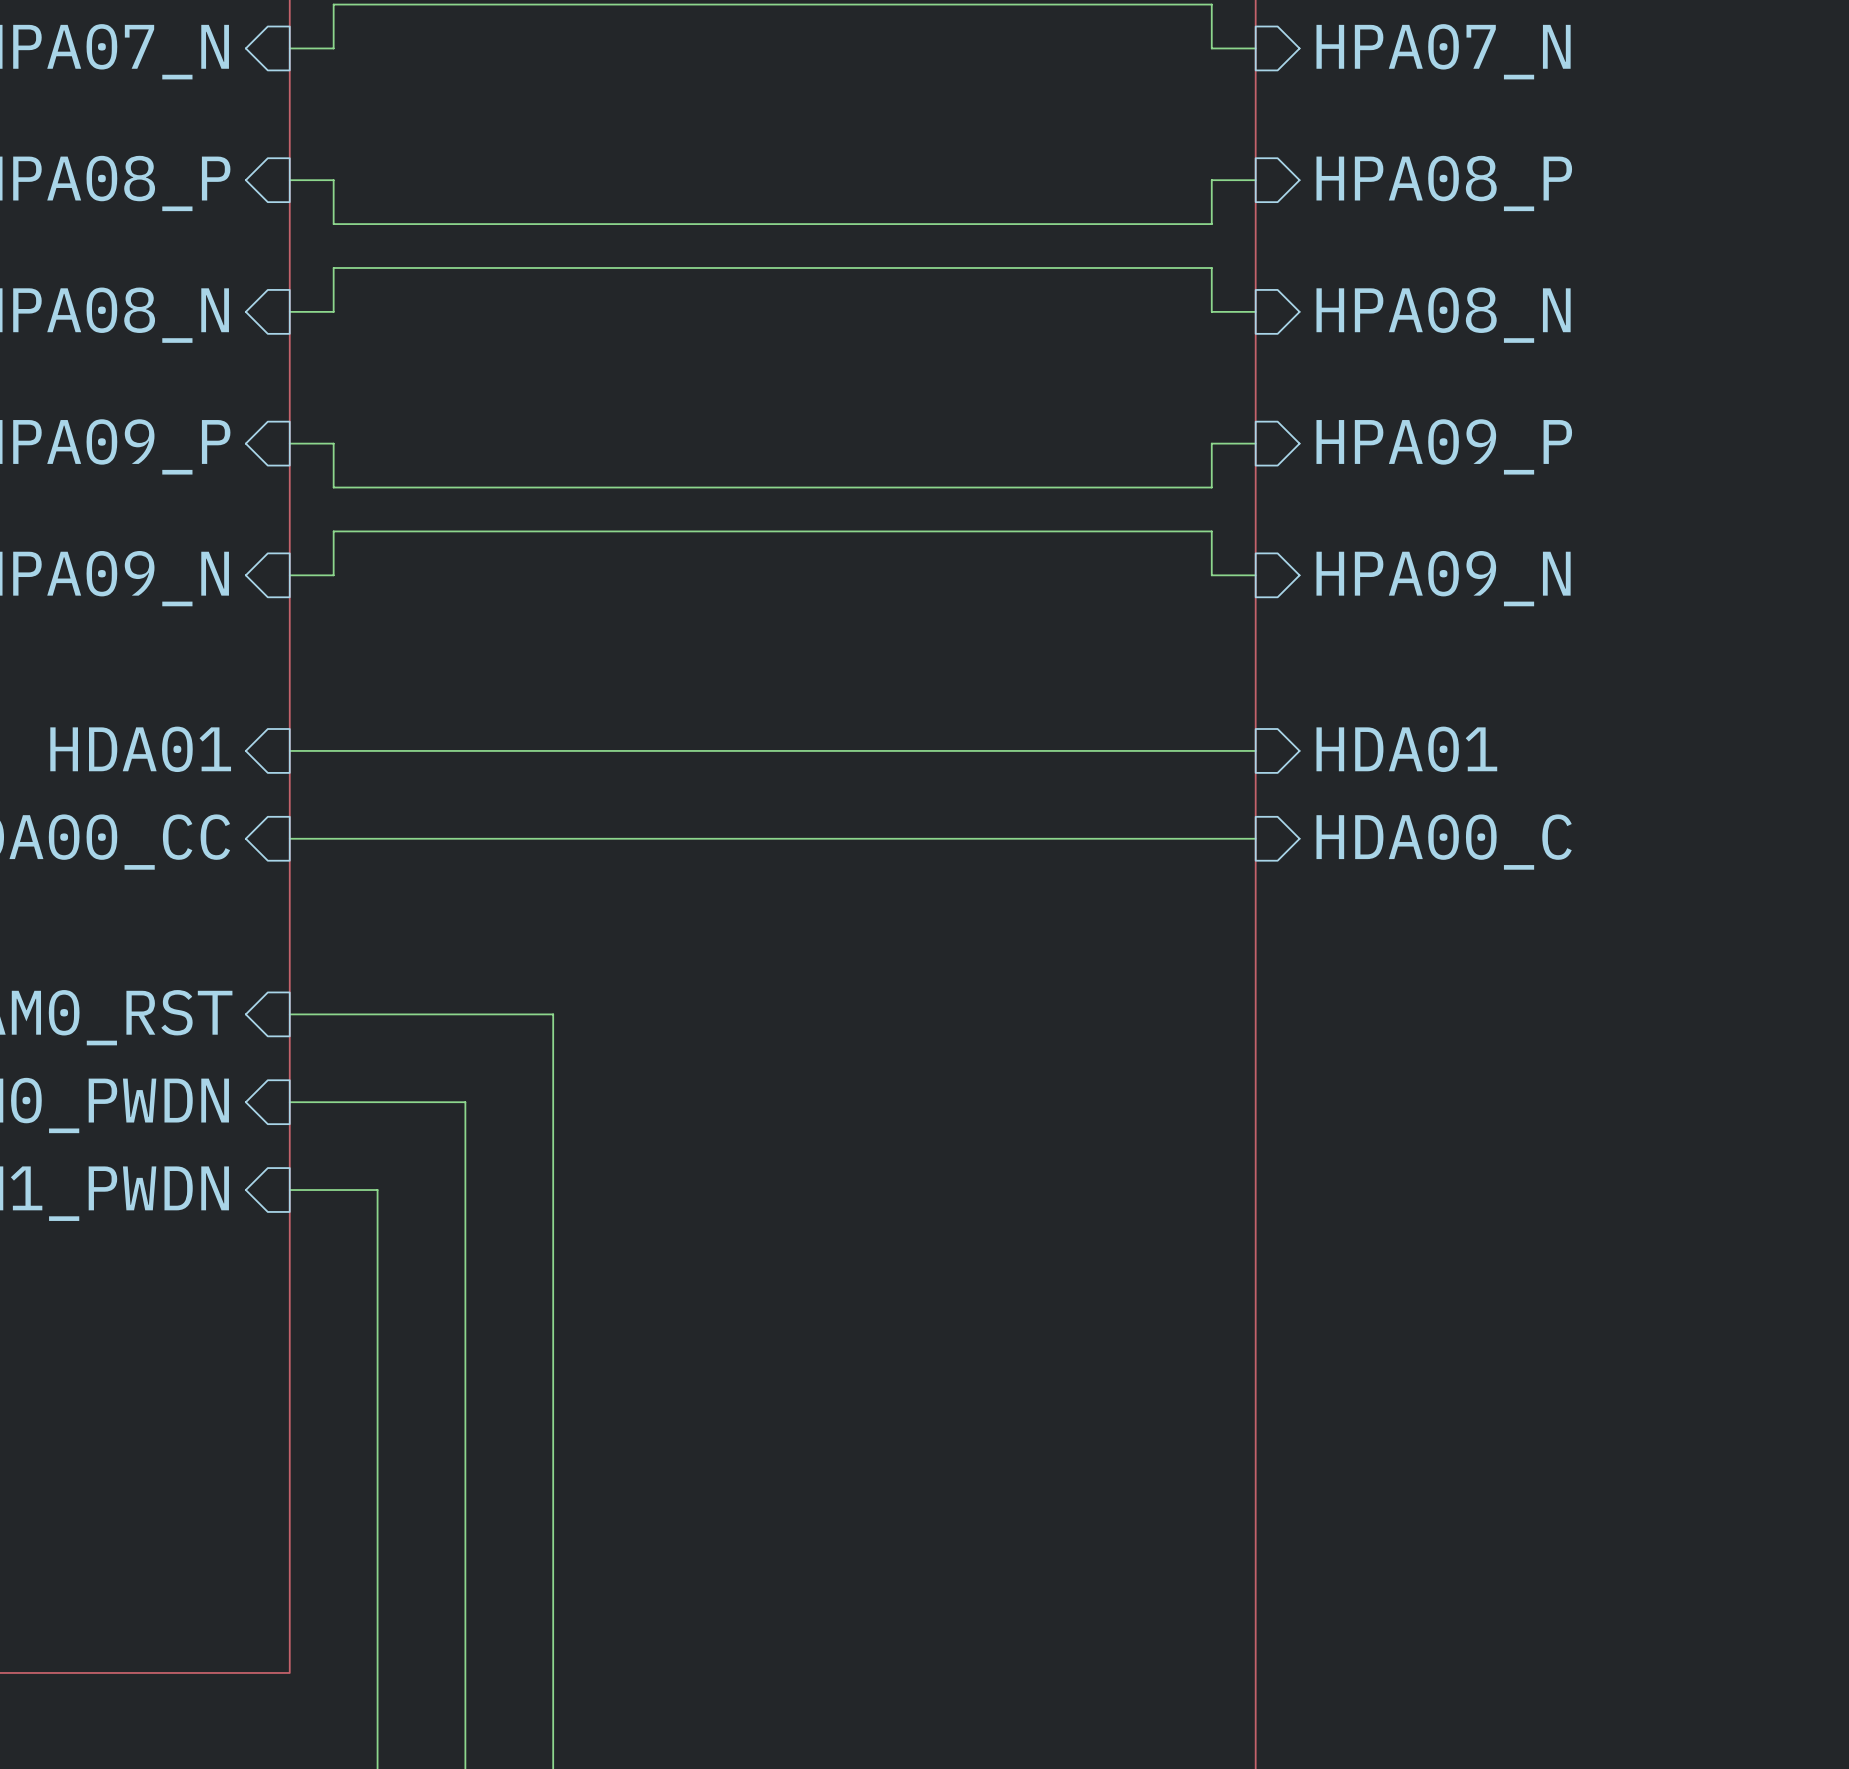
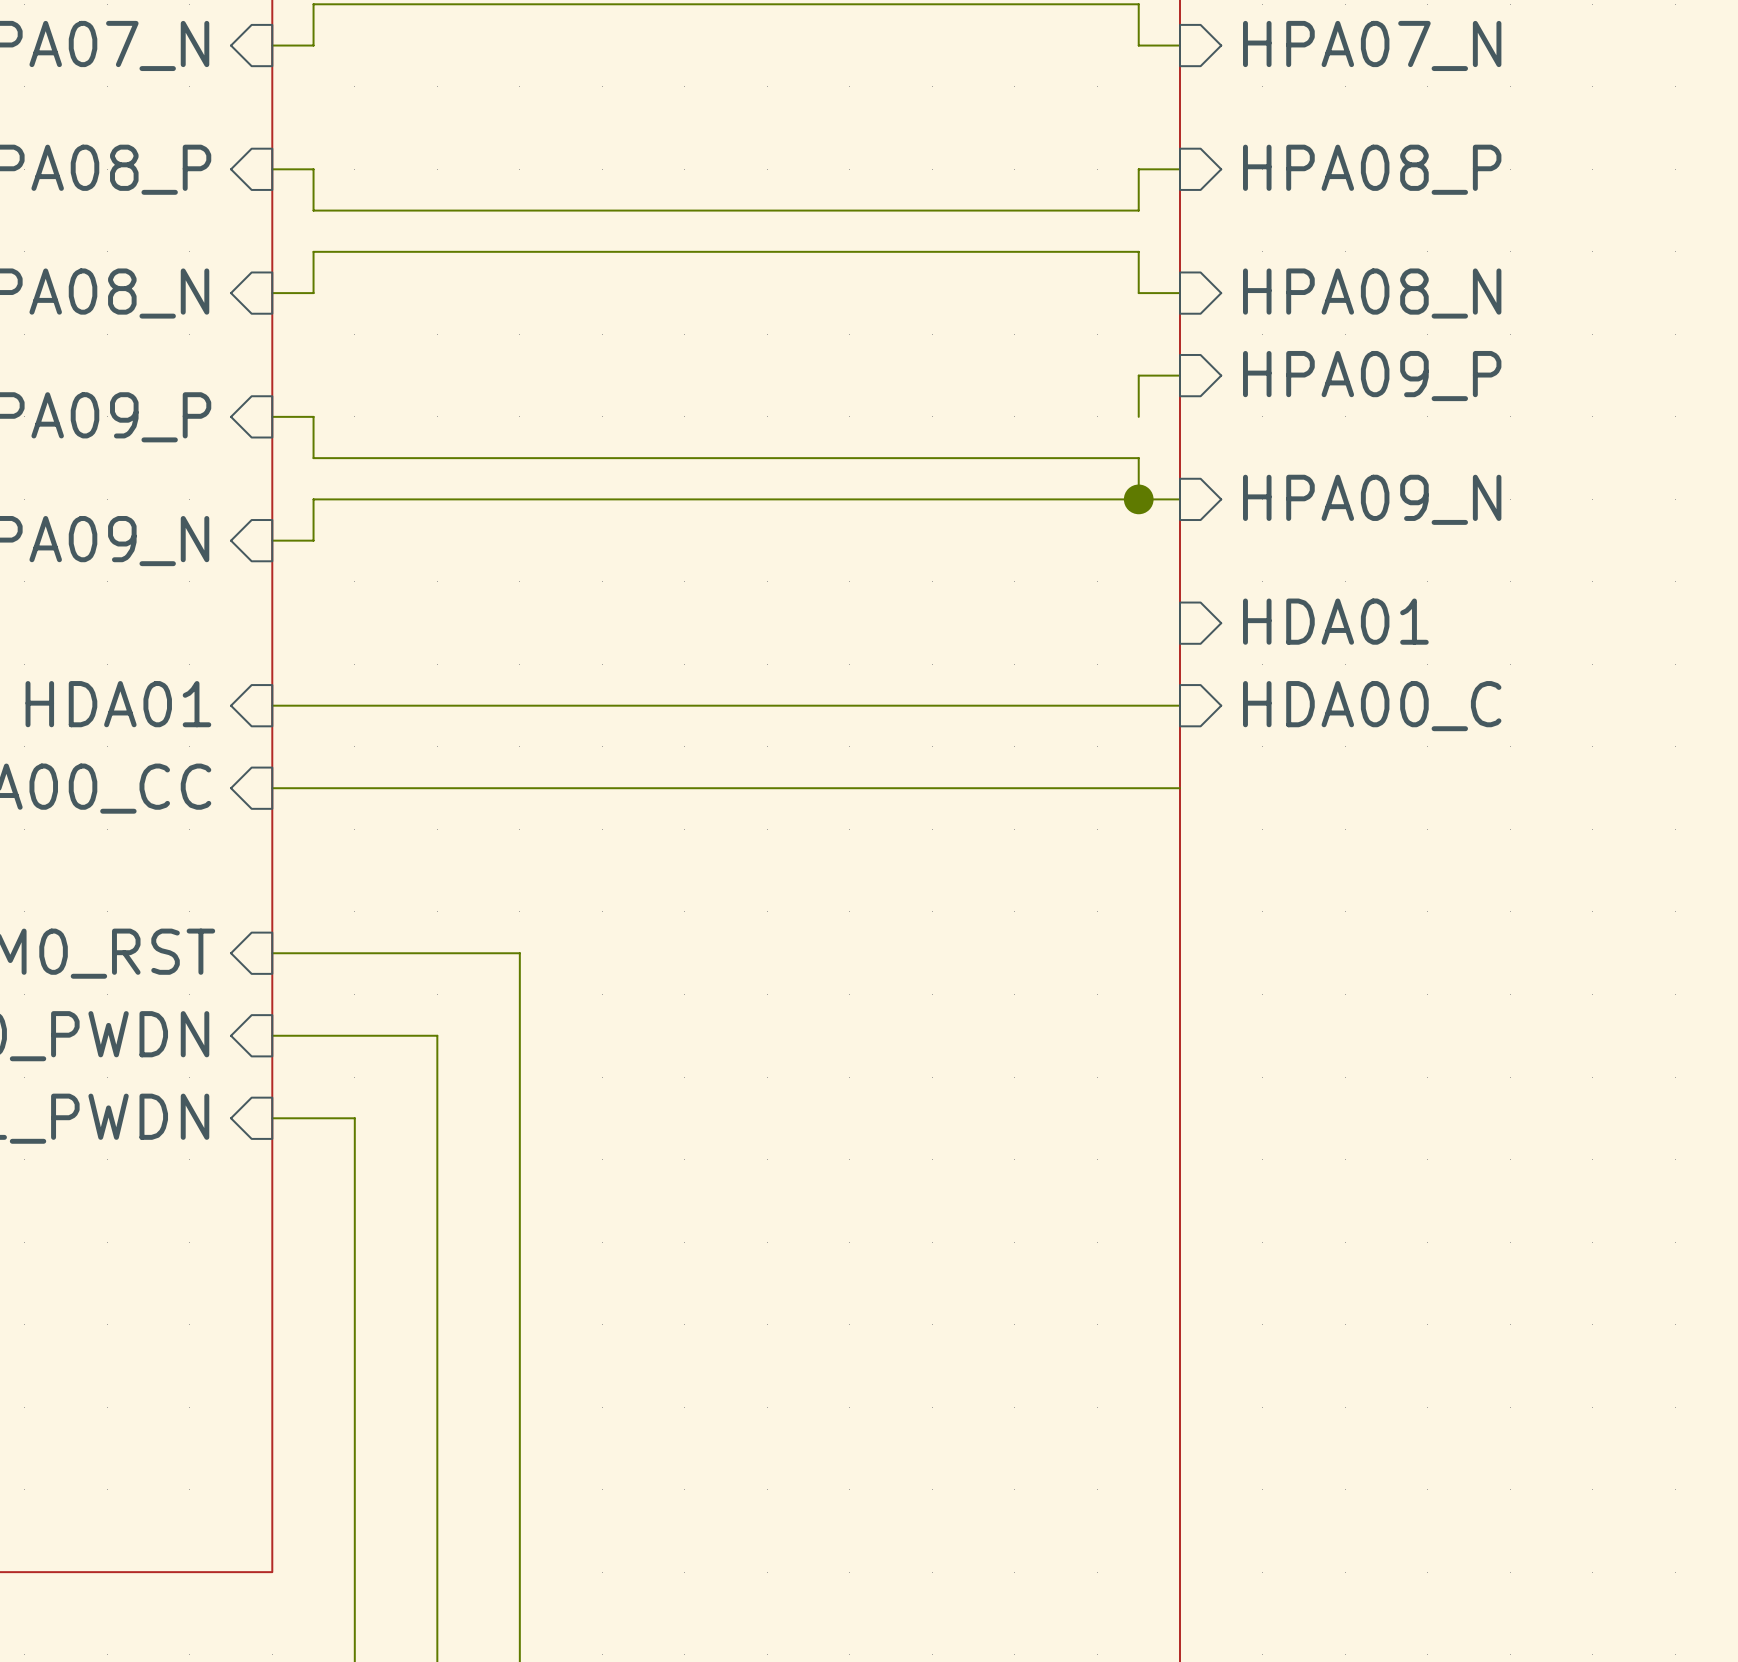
wire: none -> (1179, 375) (1138, 375) (1138, 416)
wire: (1255, 443) (1211, 443) (1211, 487) -> (1179, 499) (1138, 499) (1138, 458)
sheet pin position: HPA09_P (1444, 446) -> HPA09_P (1372, 376)
wire: (1211, 531) (1211, 575) (1255, 575) -> none
junction: none -> (1138, 499)
sheet pin position: HPA09_N (1443, 578) -> HPA09_N (1372, 499)
sheet pin: none -> HDA01 (1335, 621)
sheet pin: HDA01 (1406, 749) -> HDA00_C (1372, 706)
sheet pin: HDA00_C (1444, 842) -> none

